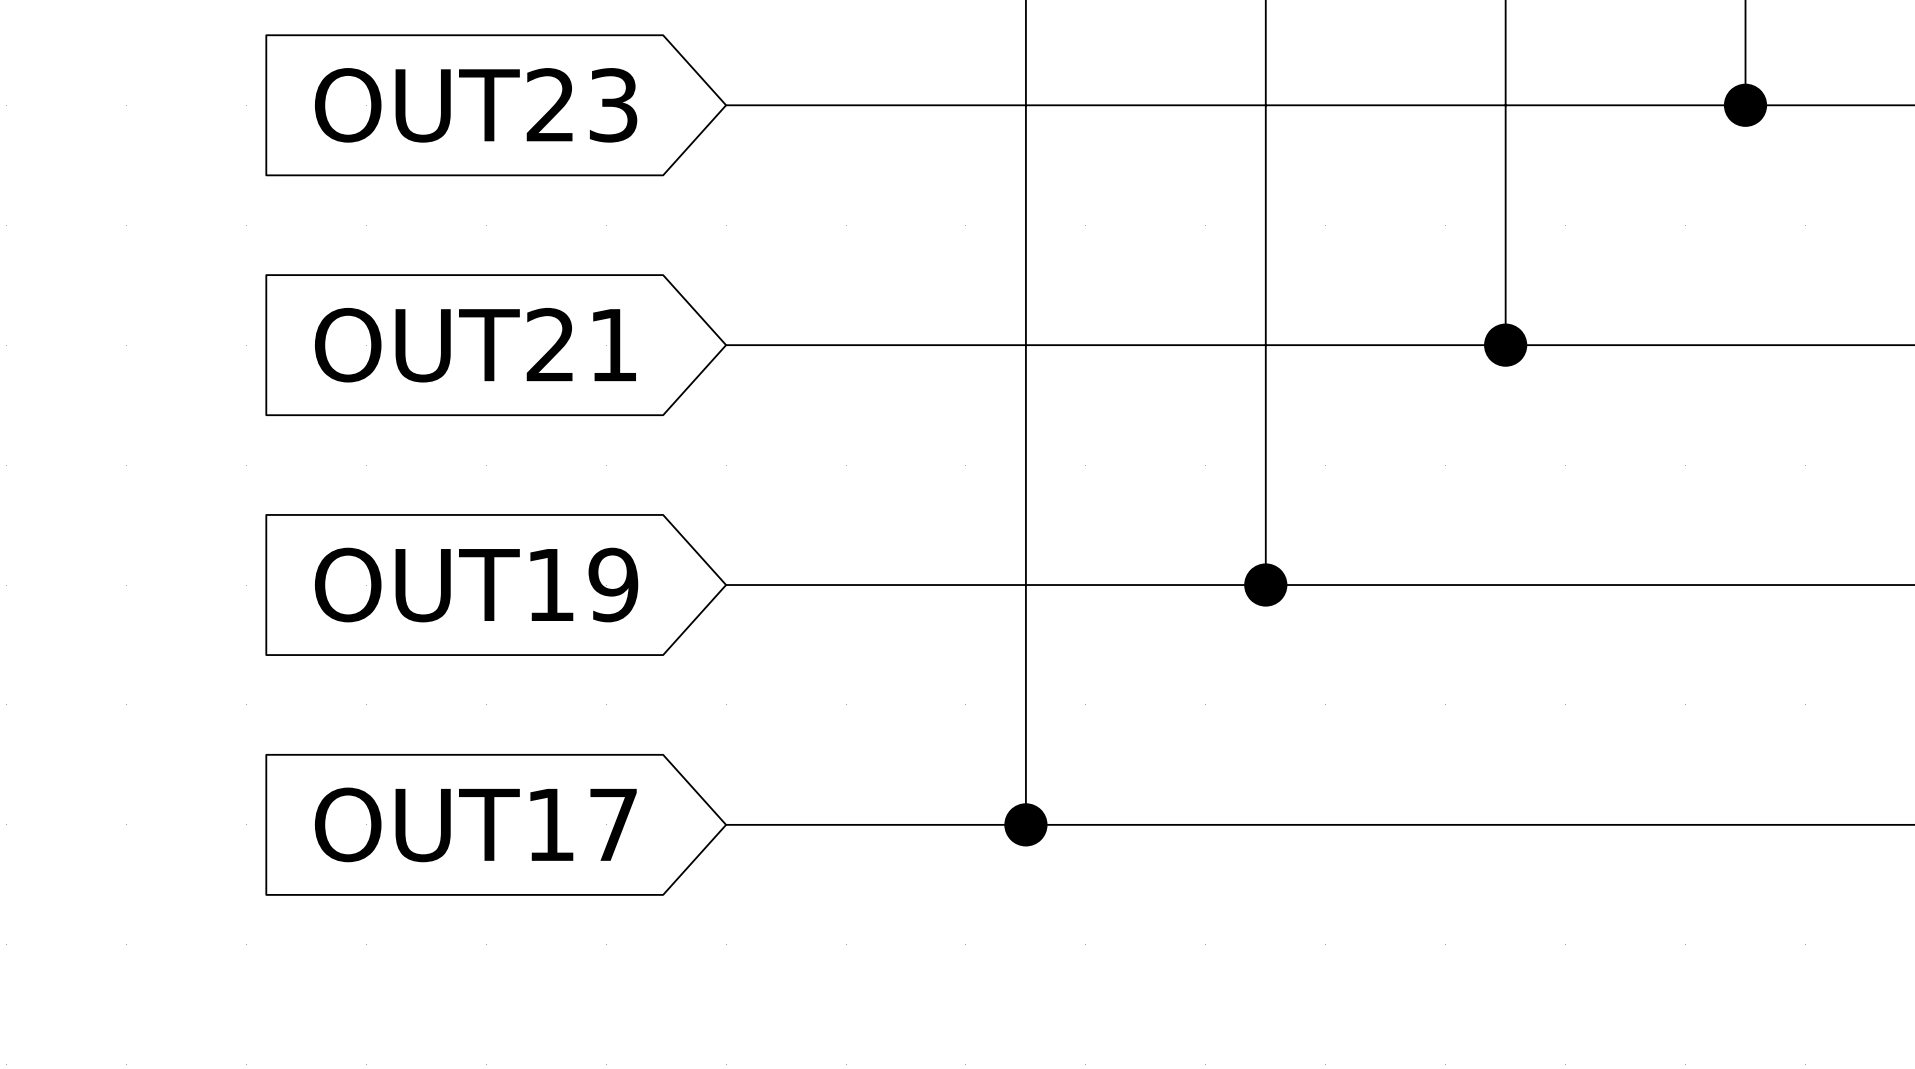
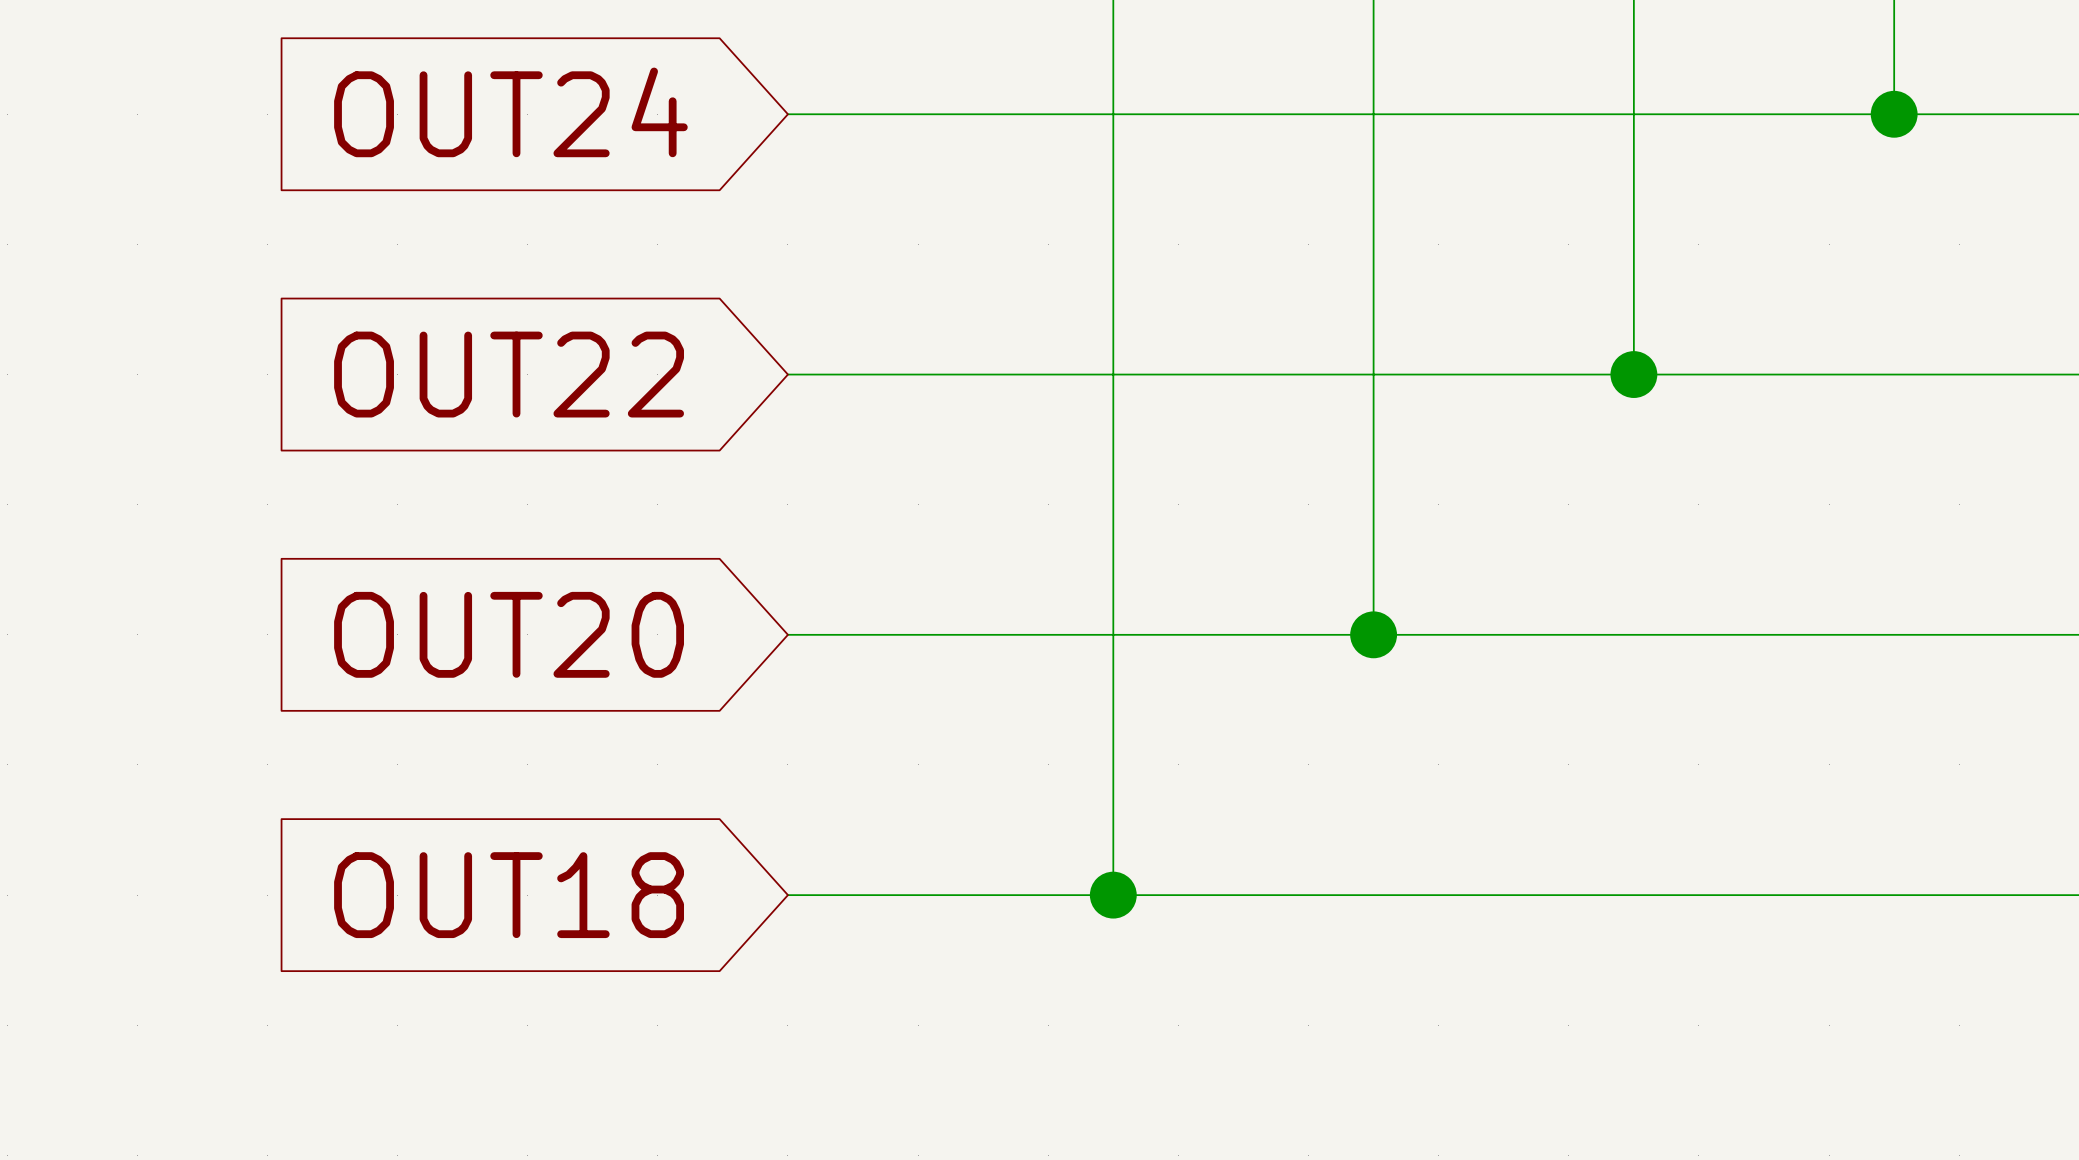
global label: OUT23 (476, 105) -> OUT24 (510, 112)
global label: OUT21 (475, 345) -> OUT22 (509, 374)
global label: OUT19 (476, 585) -> OUT20 (509, 634)
global label: OUT17 (475, 824) -> OUT18 (509, 895)

